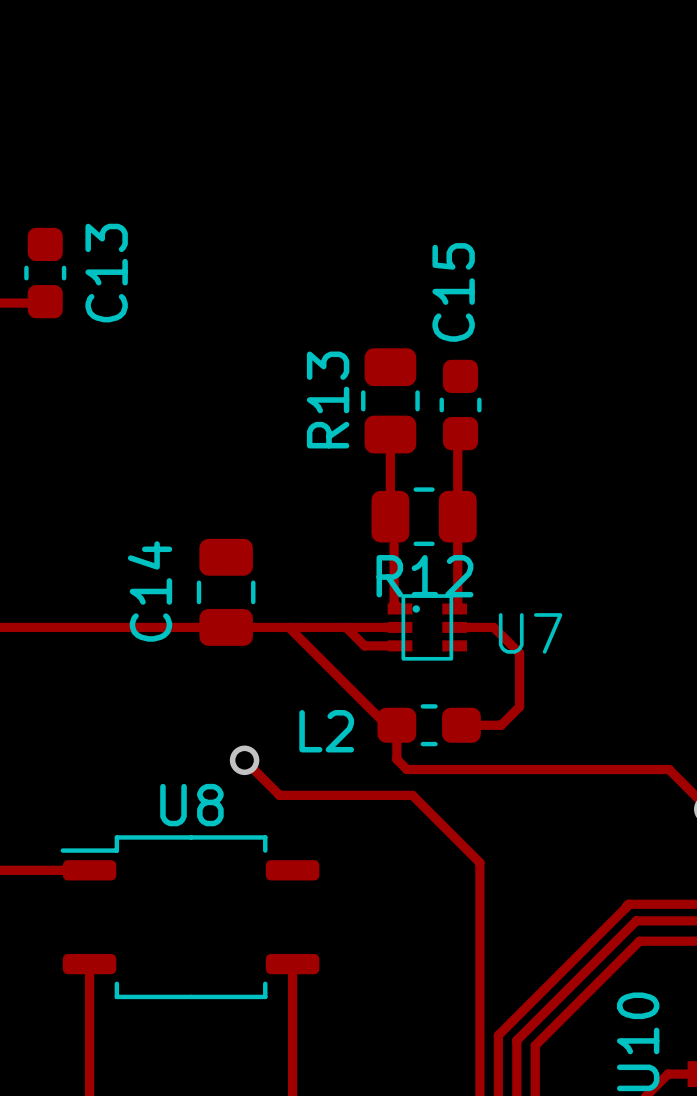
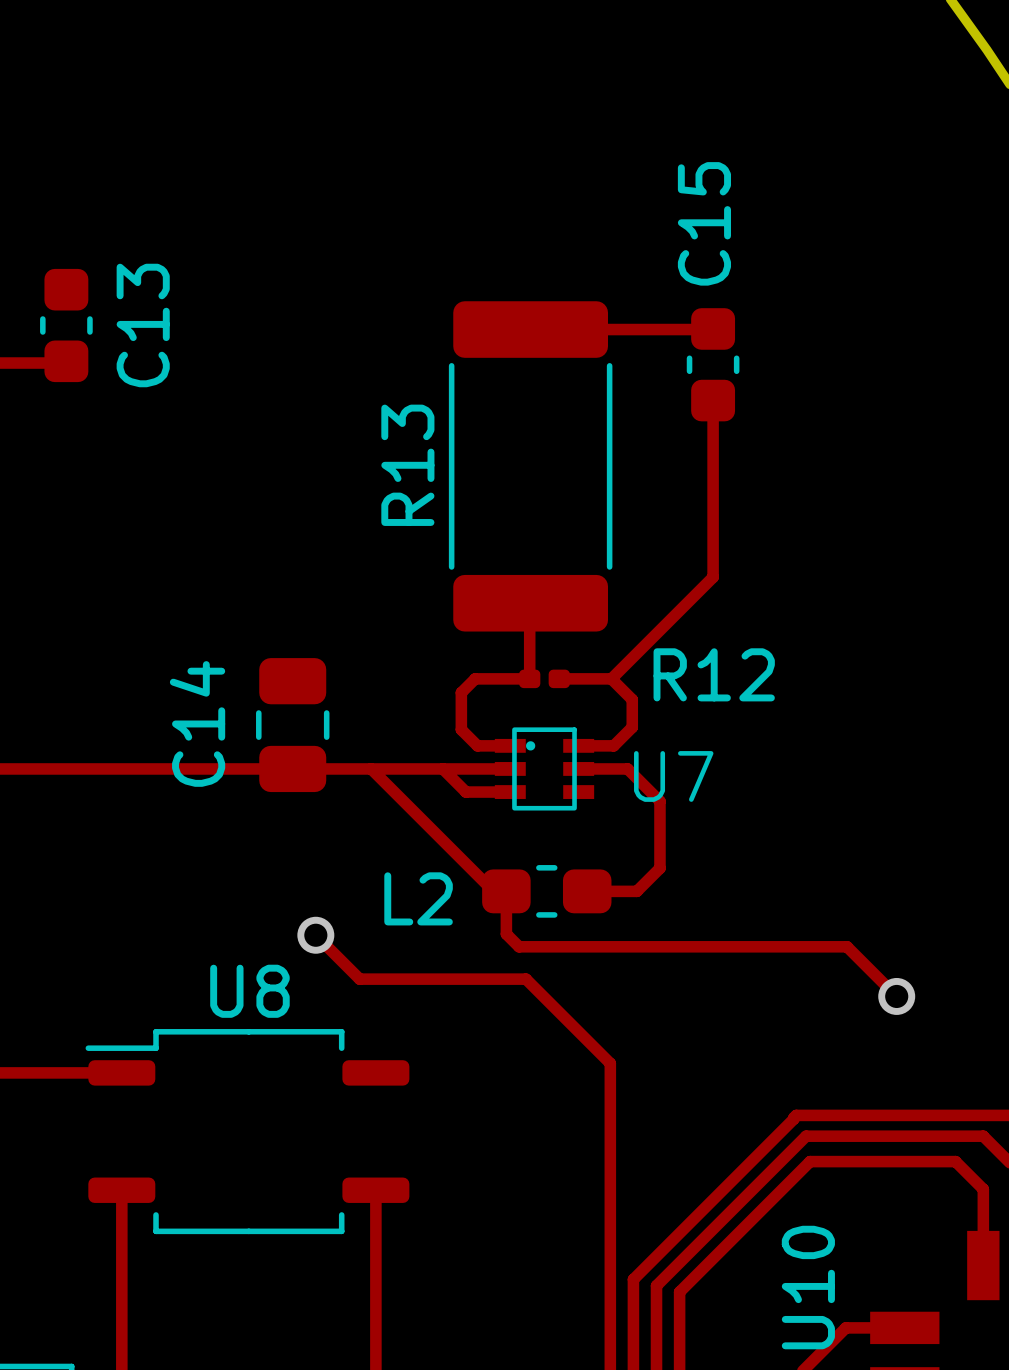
track: none -> (530, 329) (712, 329)
track: none -> (713, 400) (713, 577) (611, 678)
R13 footprint: [361, 348, 420, 454] -> [448, 301, 613, 632]
C15 position: (460, 405) -> (713, 364)
track: (460, 433) (457, 436) (457, 605) (454, 608) -> (611, 678) (632, 699) (632, 727) (613, 745) (578, 745)
track: (390, 434) (390, 516) -> none
R12 footprint: [371, 487, 477, 547] -> [519, 669, 570, 689]
track: (394, 544) (394, 603) (400, 608) -> (530, 603) (529, 678) (475, 678) (461, 692) (461, 729) (477, 745) (510, 745)
track: none -> (559, 678) (611, 678)
R12 name position: R12 (424, 576) -> R12 (714, 674)

